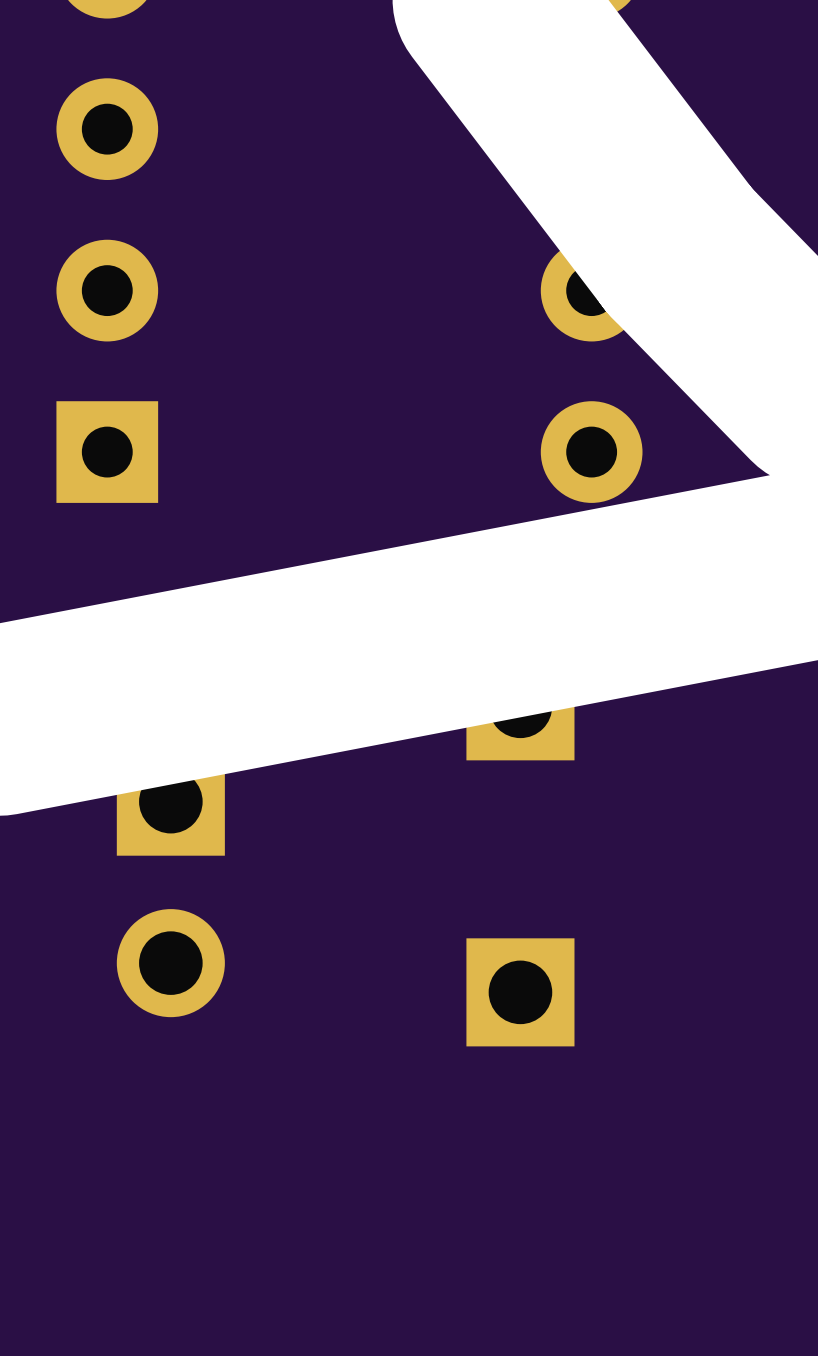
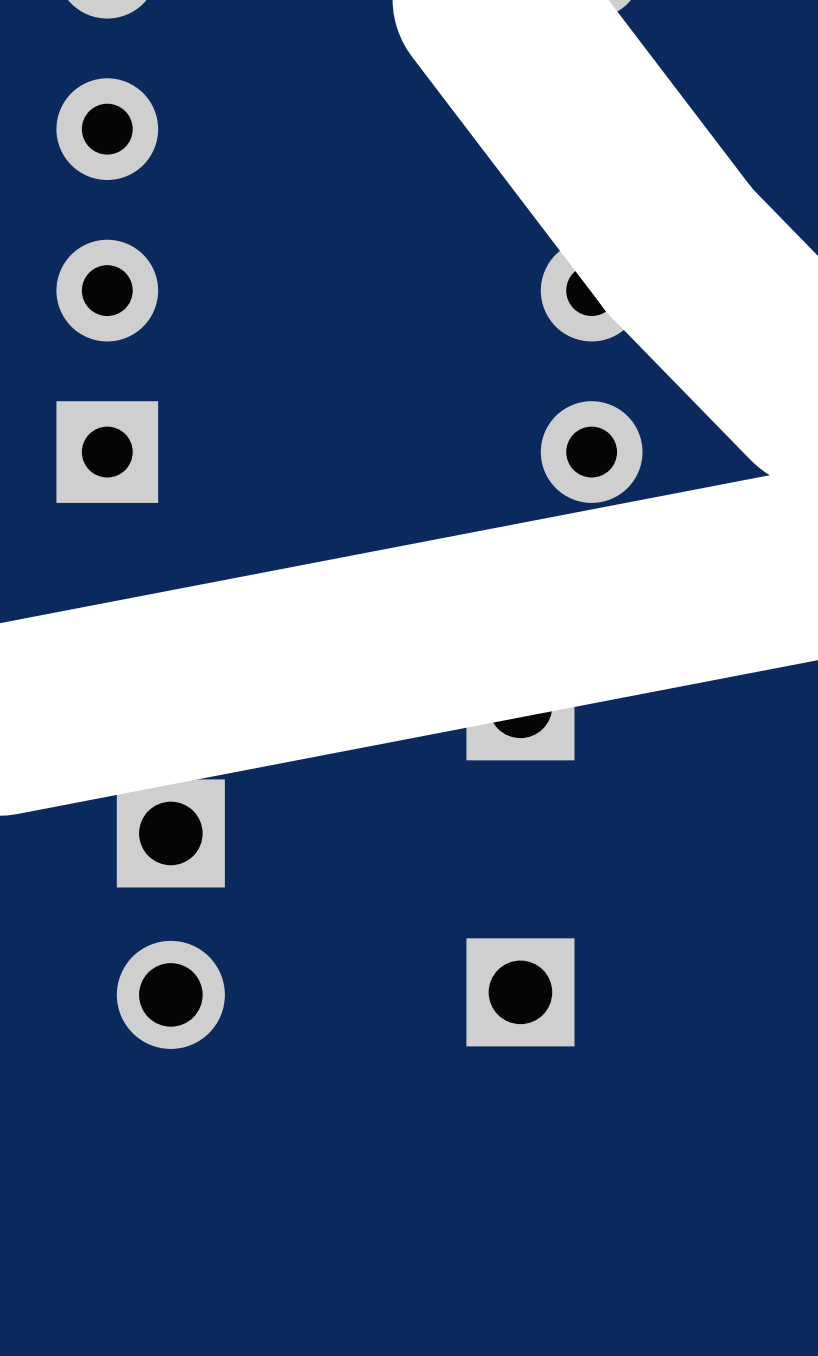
part position: (170, 882) -> (170, 914)

